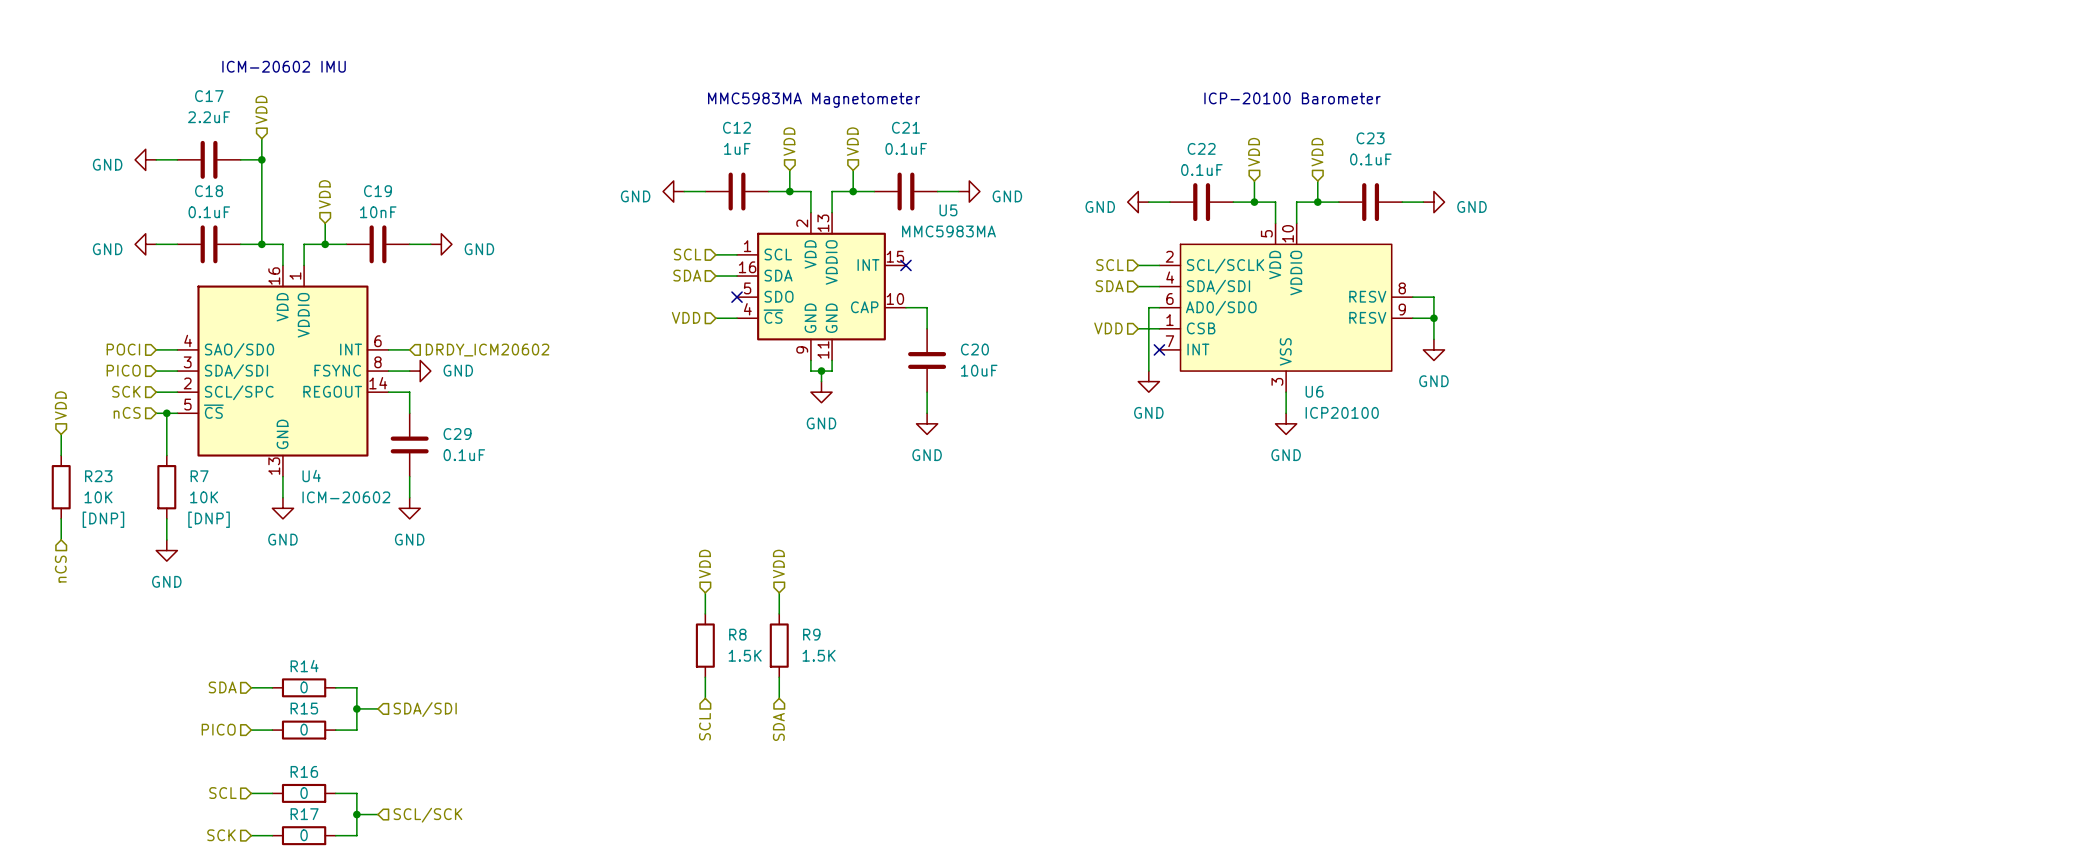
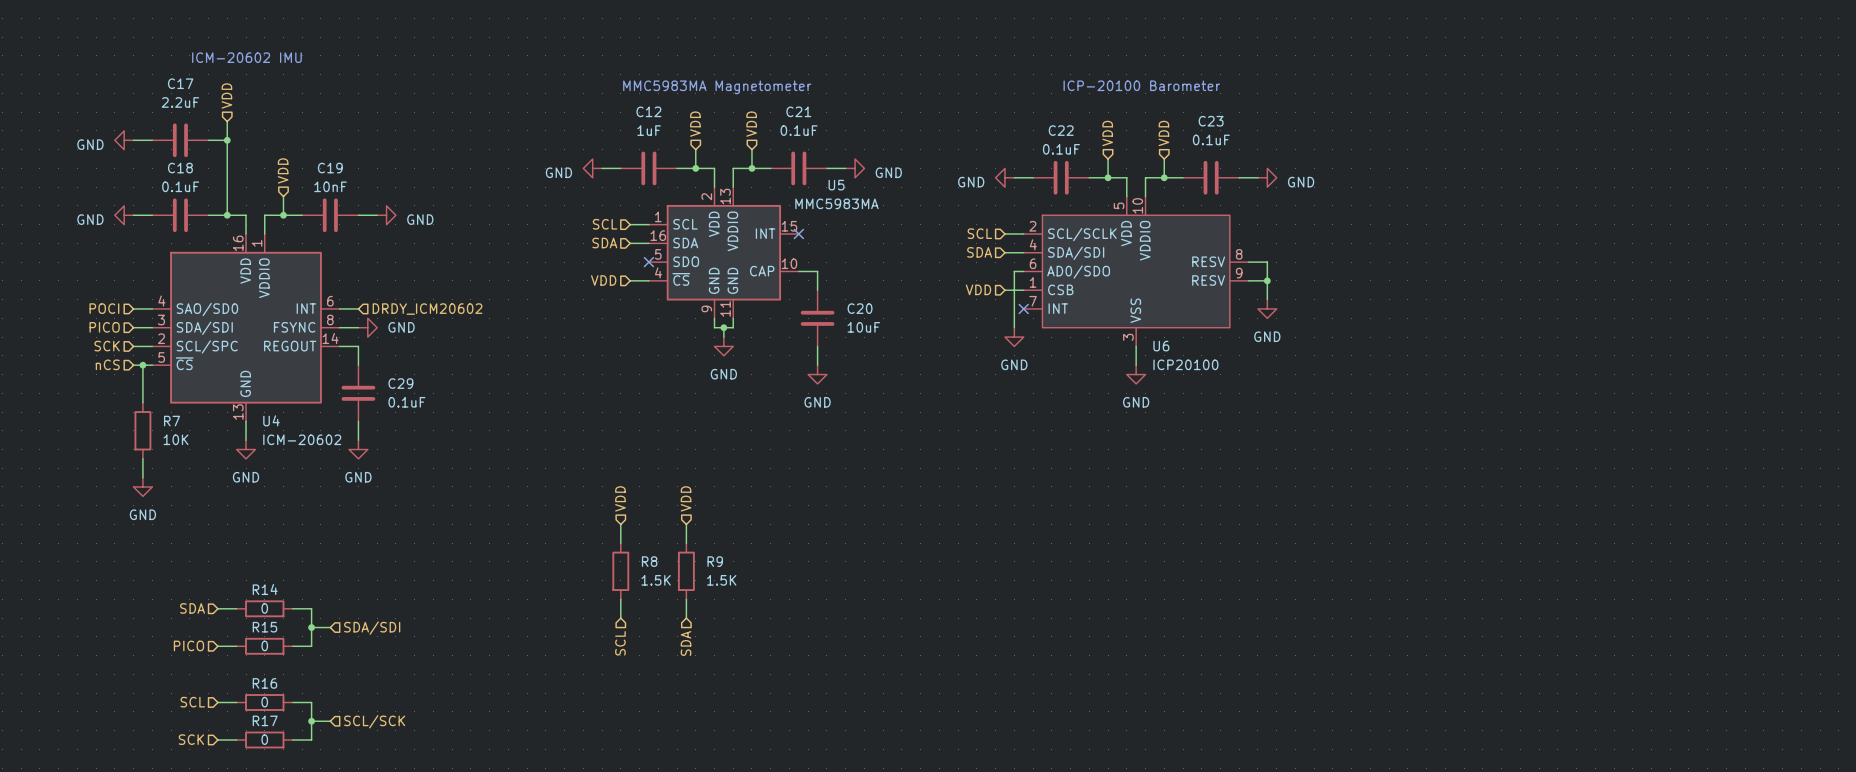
hierarchical label: VDD (60, 405) -> none
wire: (61, 434) (61, 455) -> none
R23: 10K (61, 487) -> none
wire: (61, 518) (61, 540) -> none
R7 text: [DNP] (209, 519) -> none
hierarchical label: nCS (60, 569) -> none

